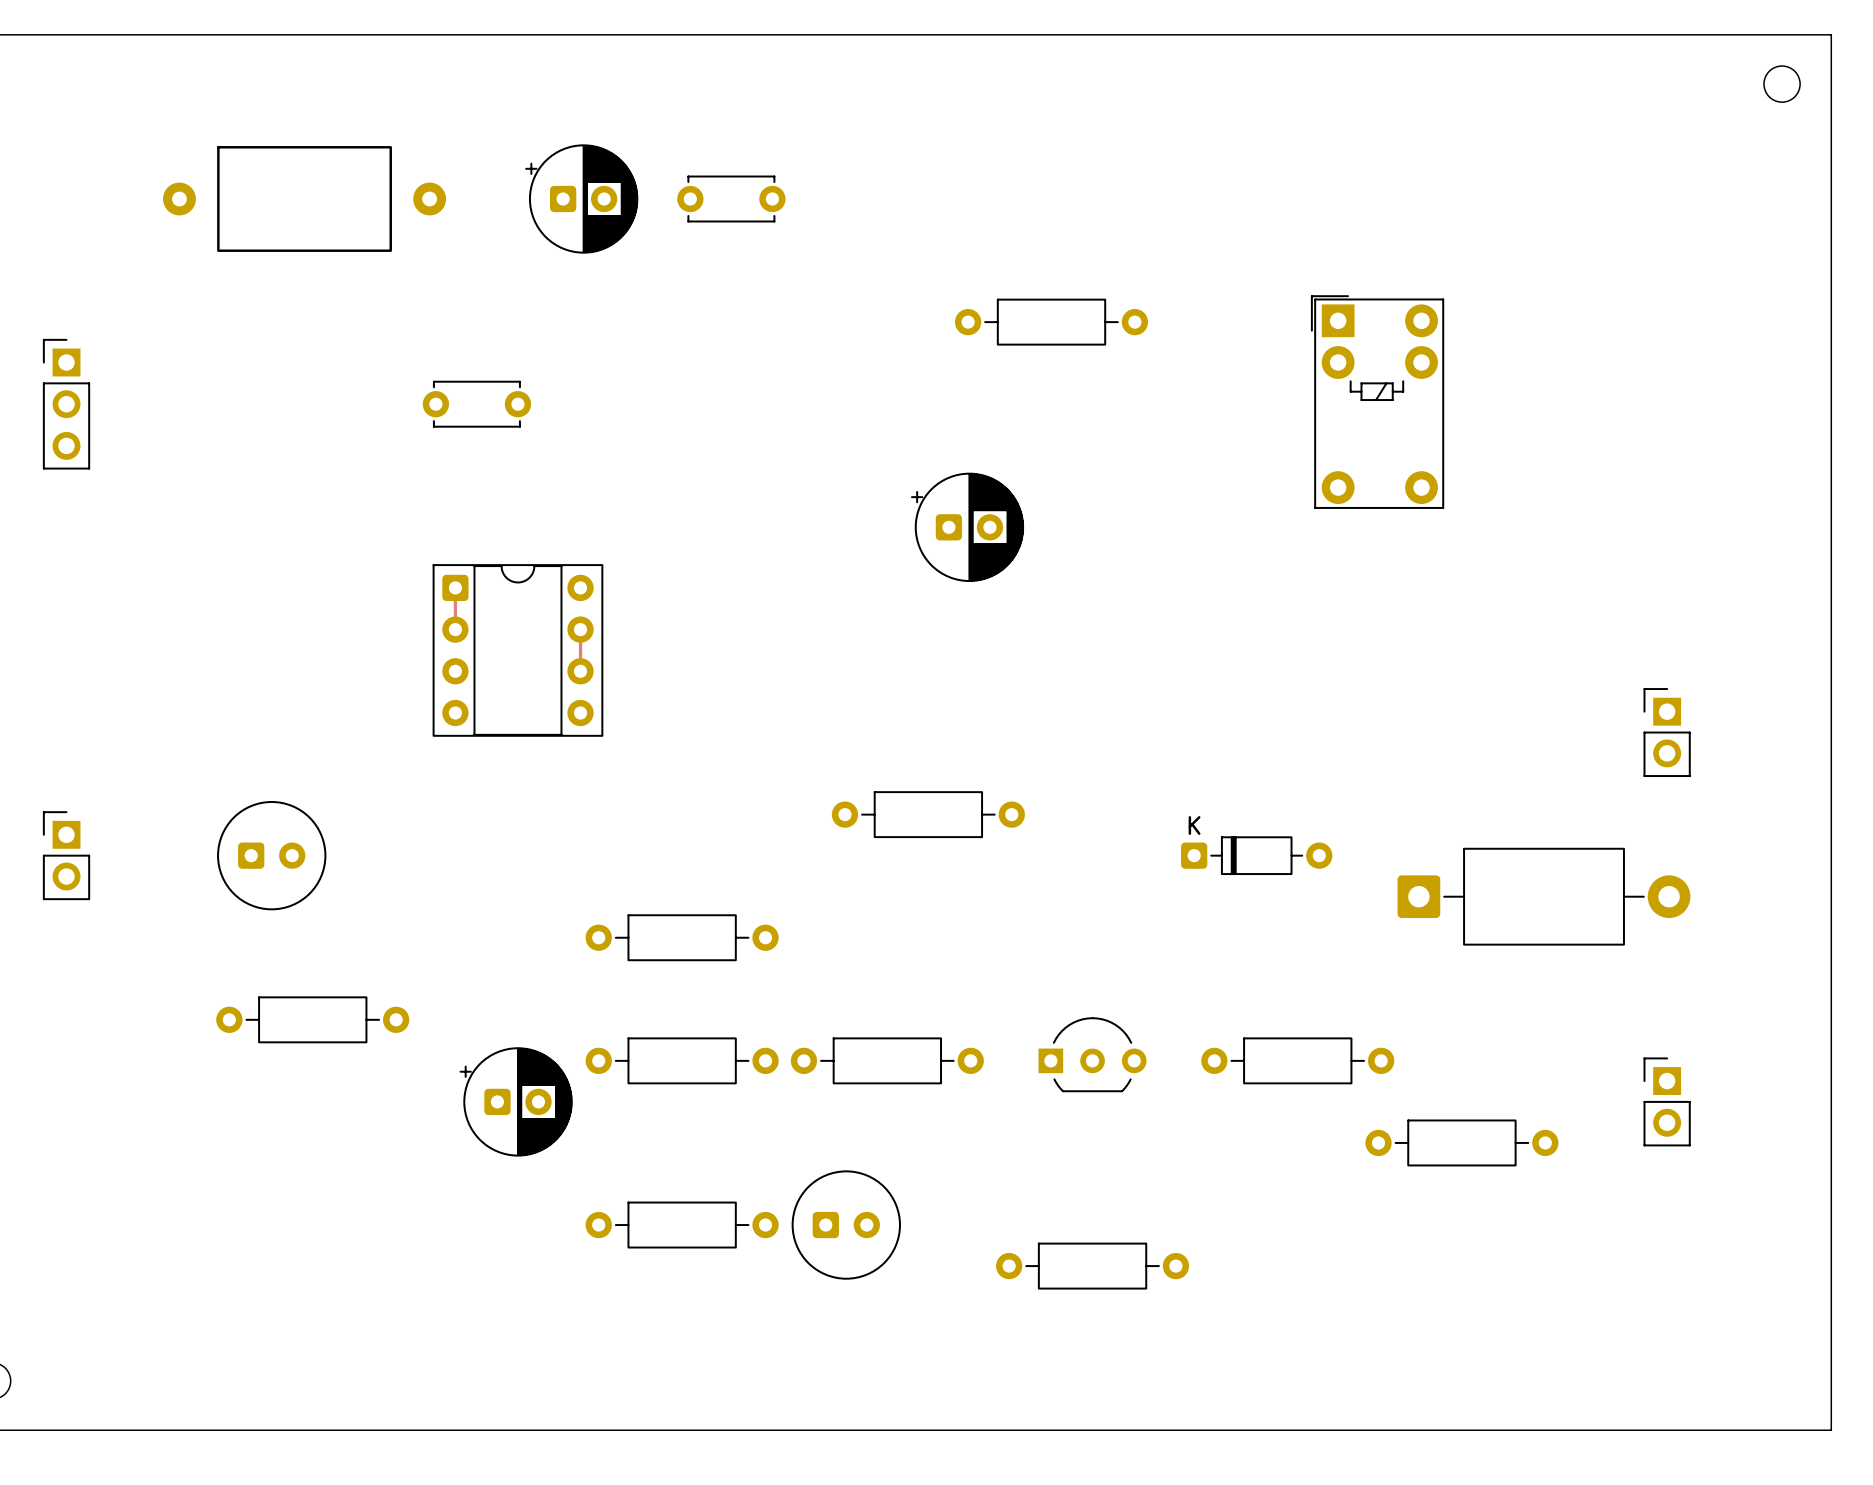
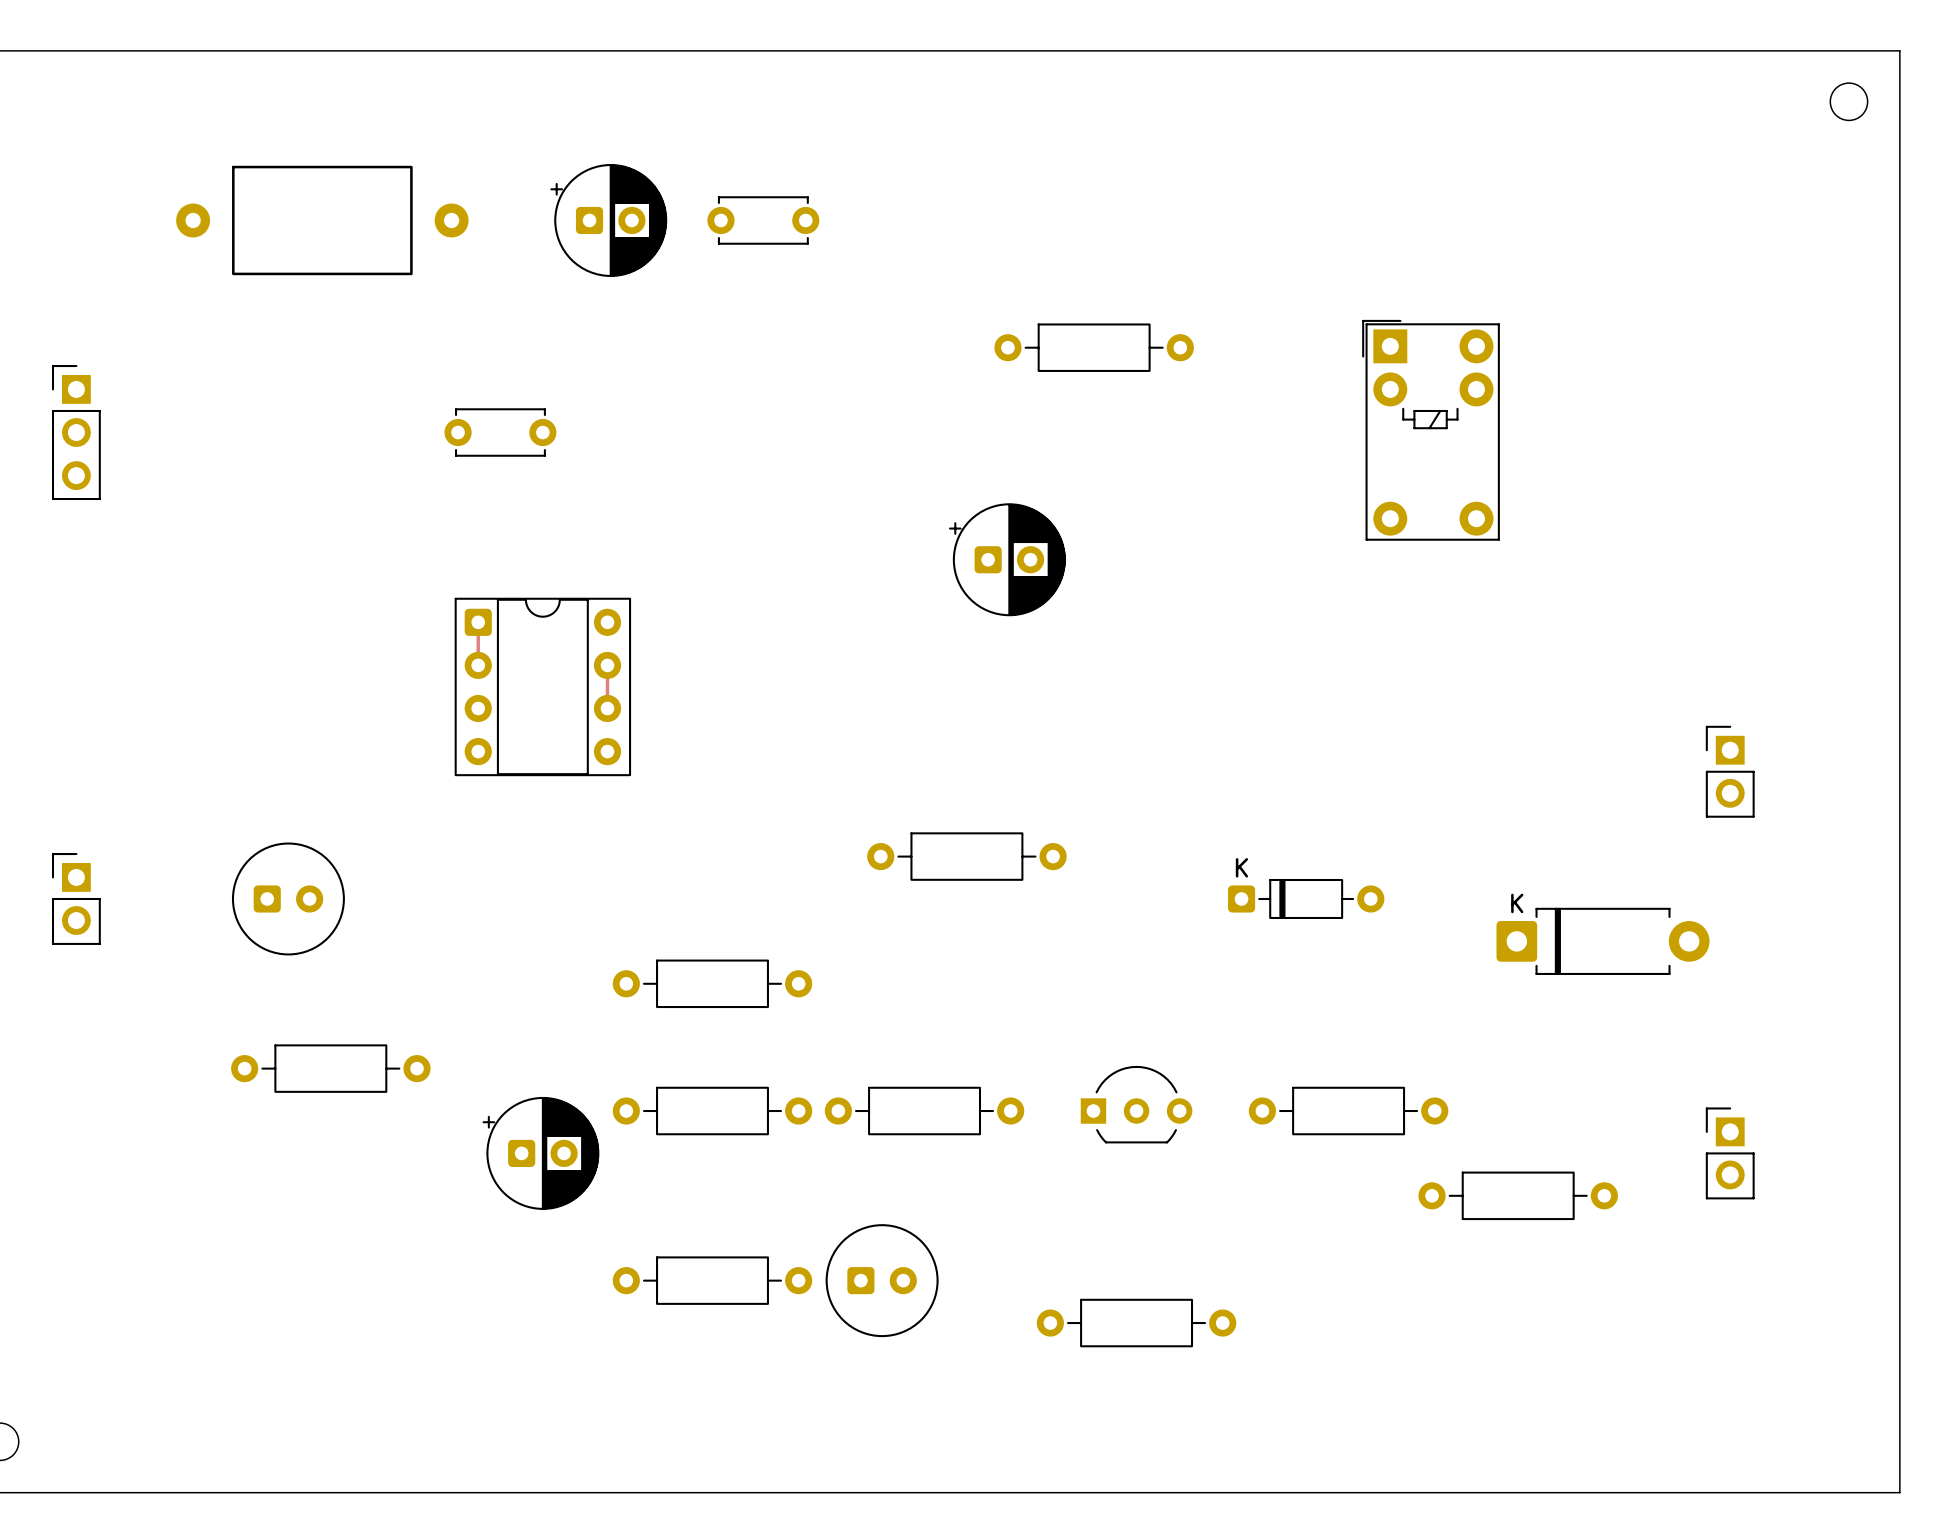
part footprint: [1397, 847, 1691, 946] -> [1496, 907, 1710, 975]

